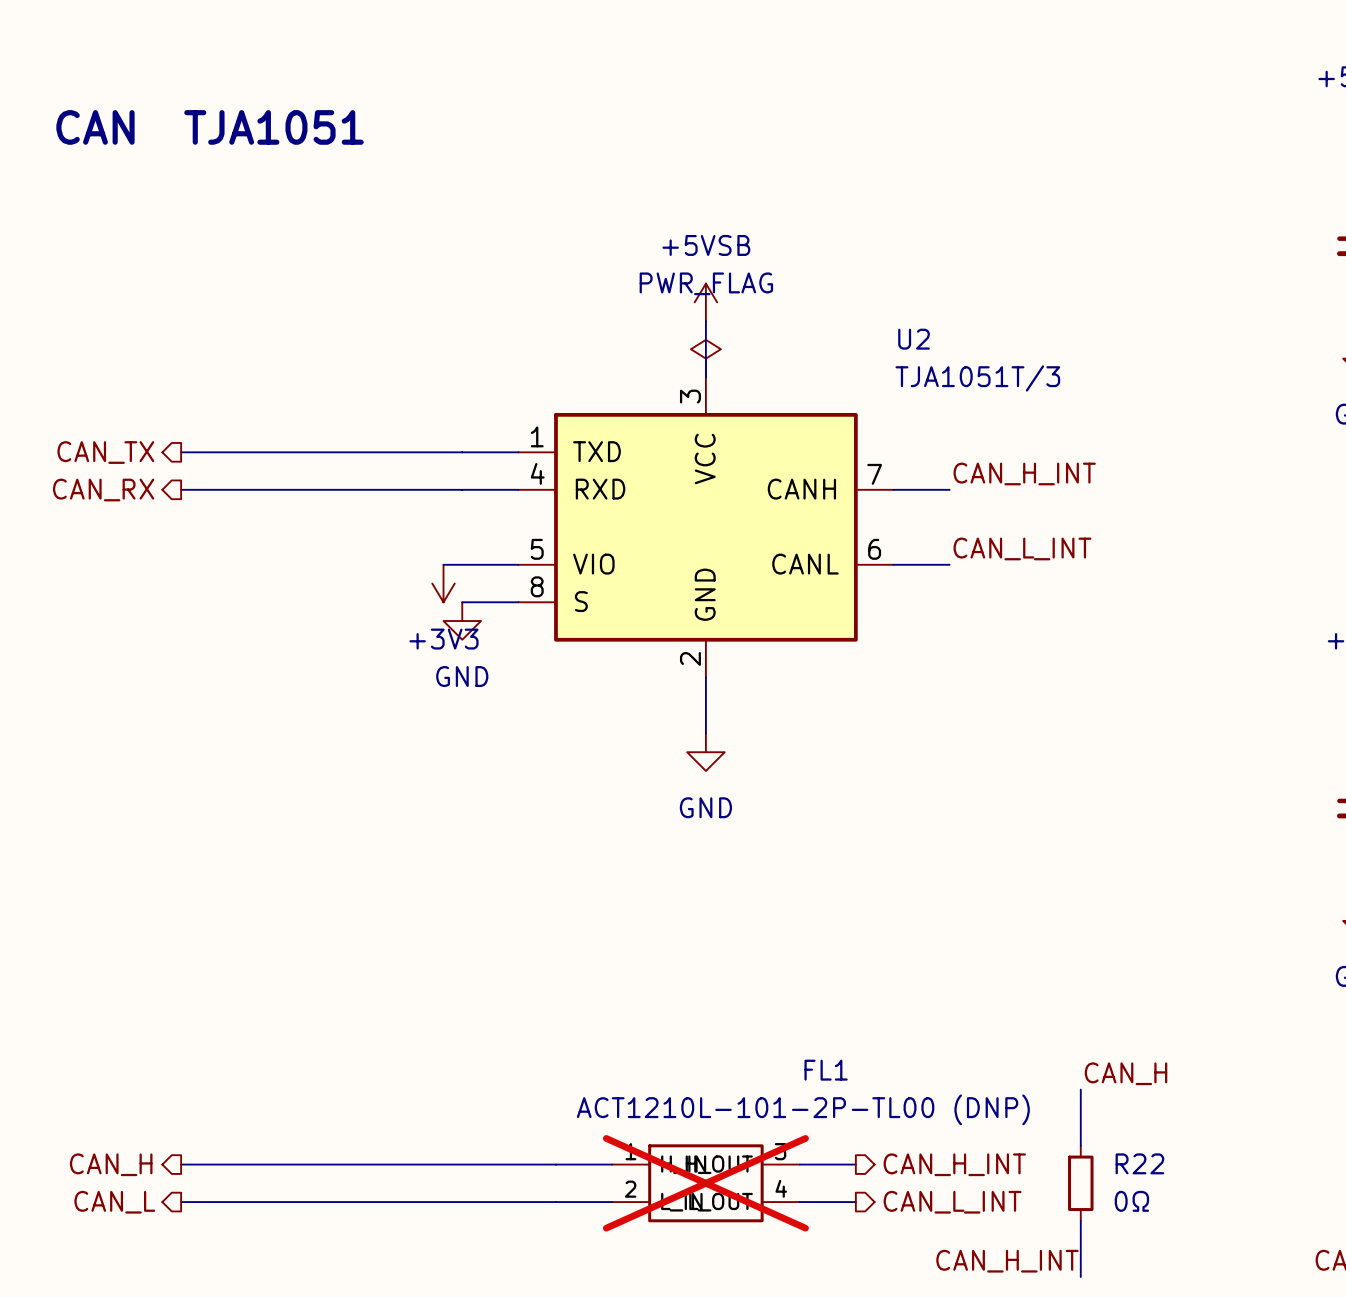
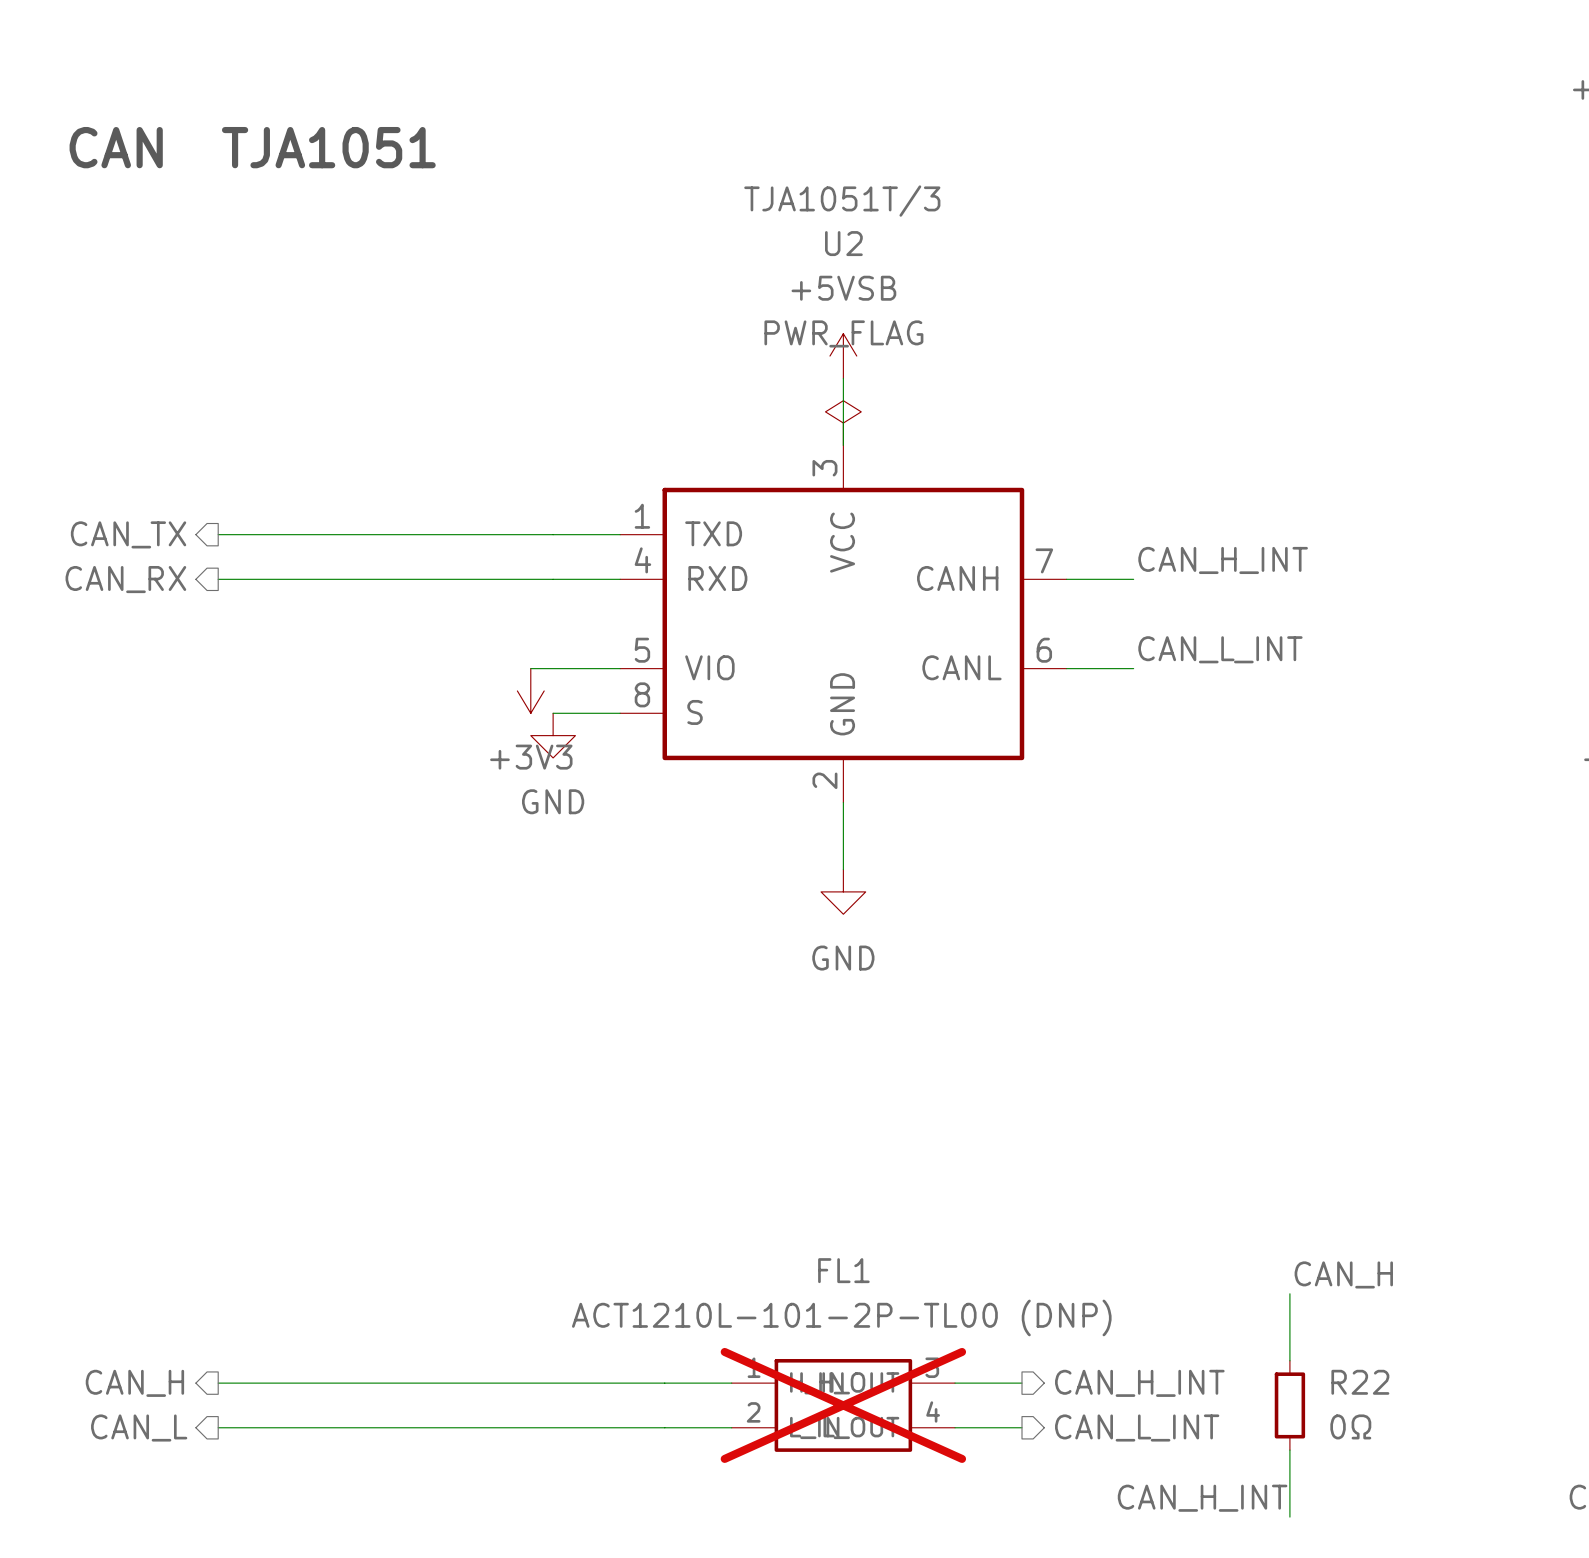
U2 name position: U2 (914, 339) -> U2 (843, 243)
U2 value position: TJA1051T/3 (977, 378) -> TJA1051T/3 (842, 201)
FL1 name position: FL1 (826, 1070) -> FL1 (843, 1270)
FL1 value position: ACT1210L-101-2P-TL00 (DNP) (803, 1109) -> ACT1210L-101-2P-TL00 (DNP) (841, 1317)

